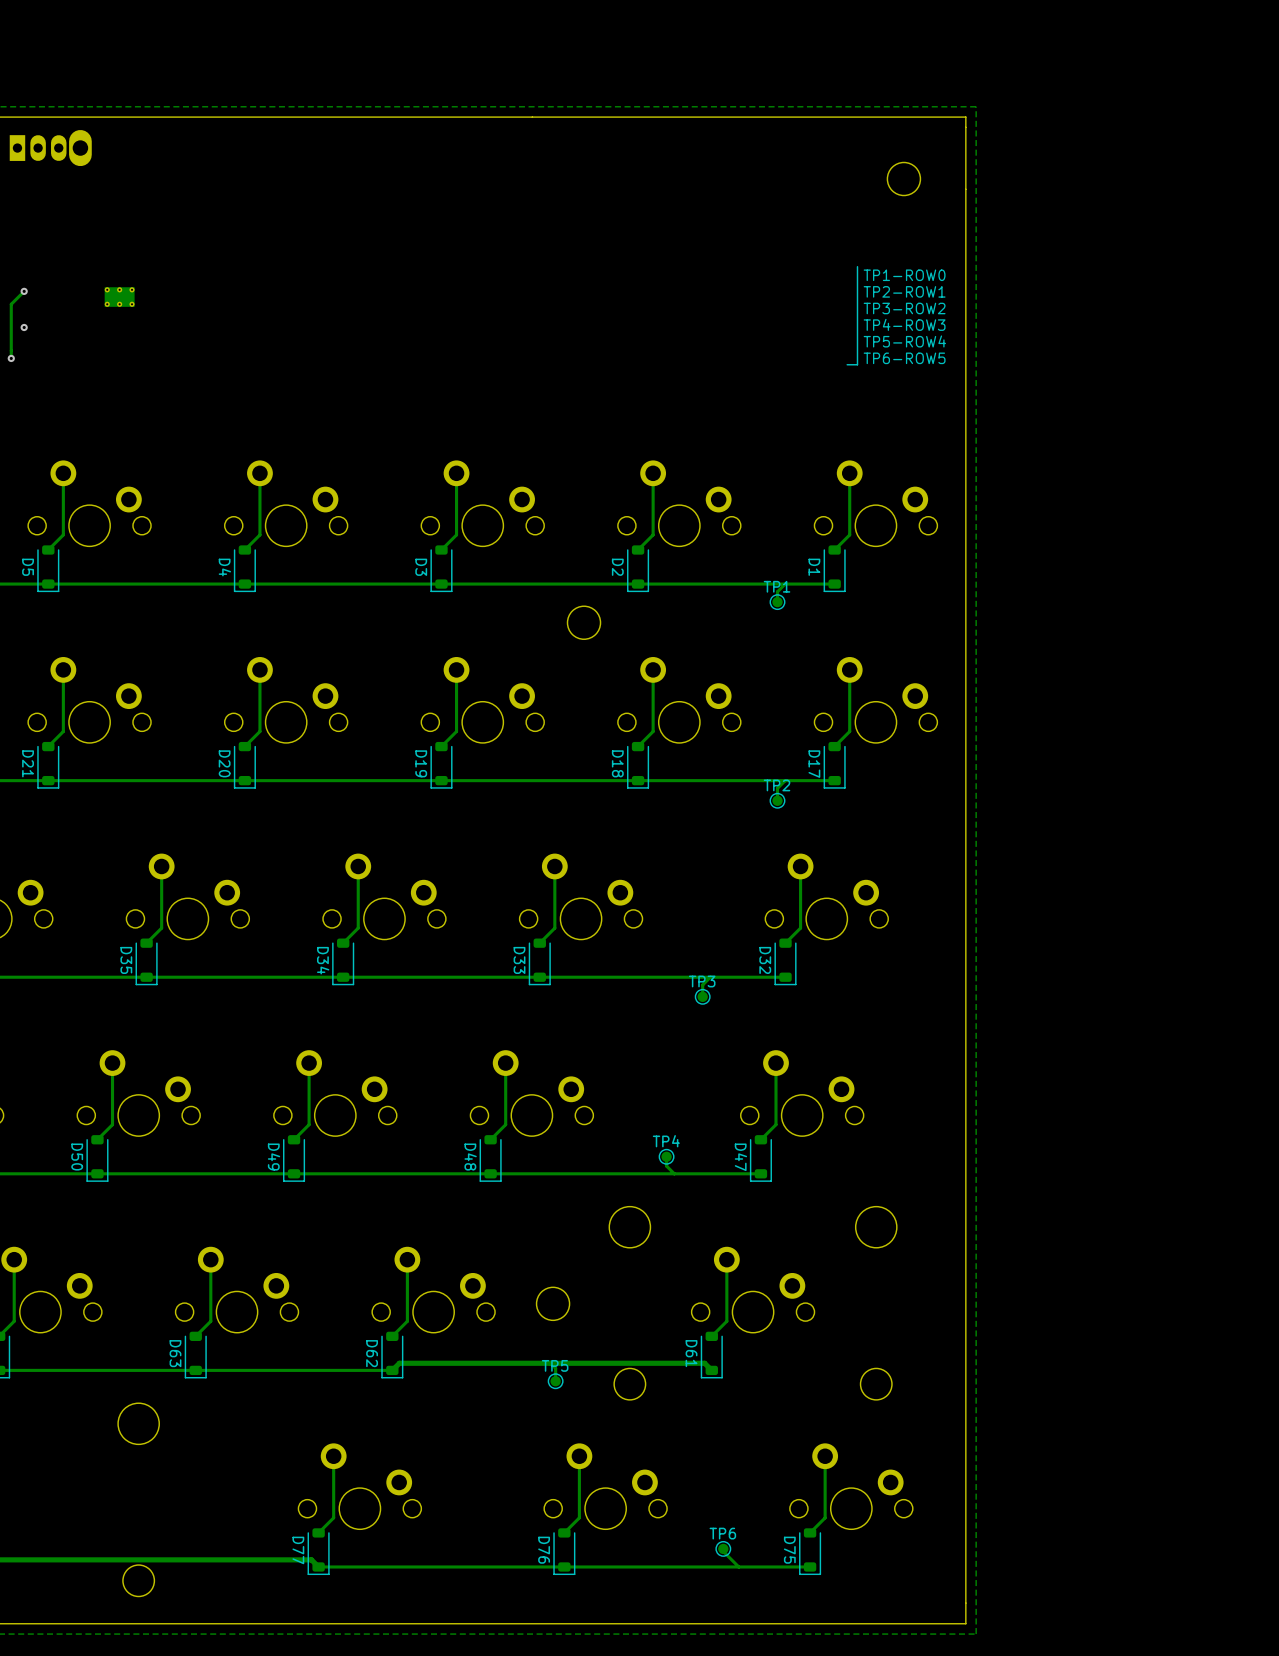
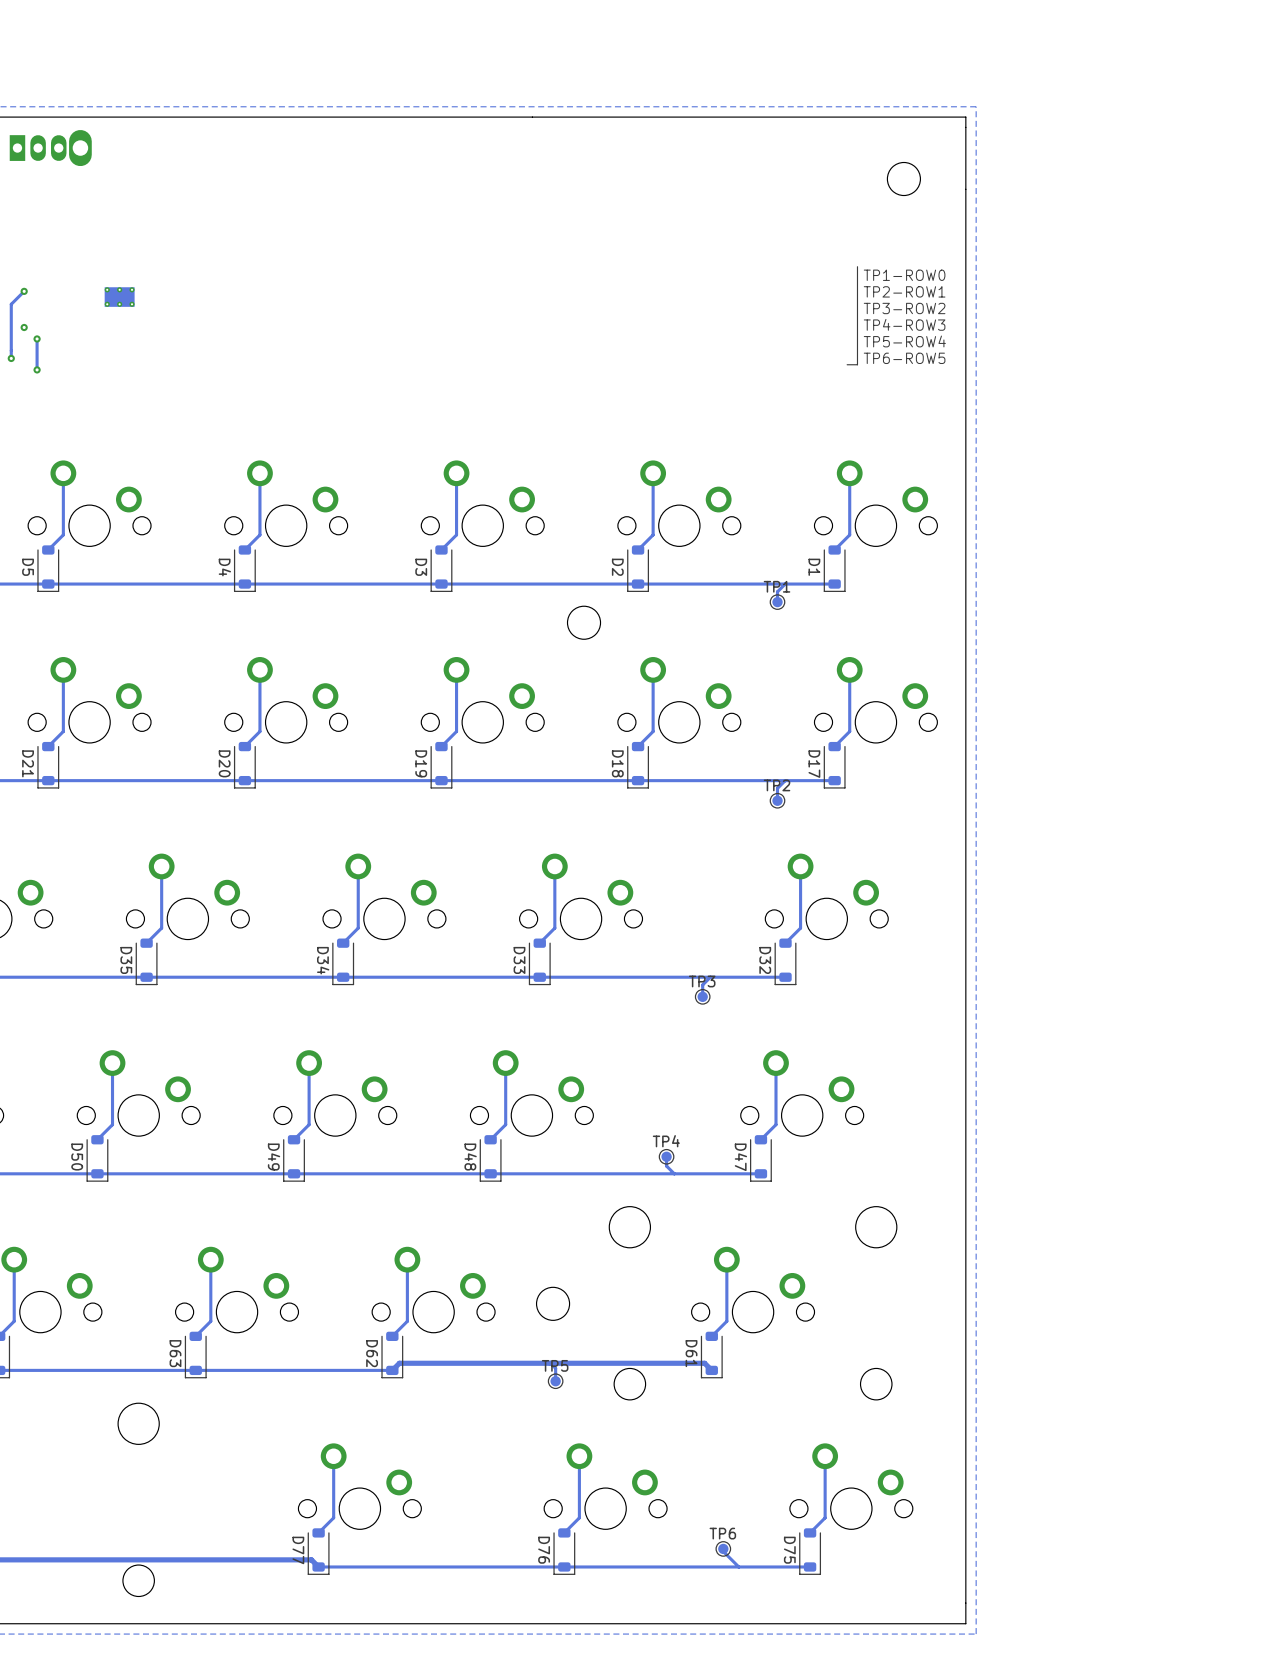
track: none -> (37, 338) (37, 369)
via: none -> (37, 338)
via: none -> (37, 369)

